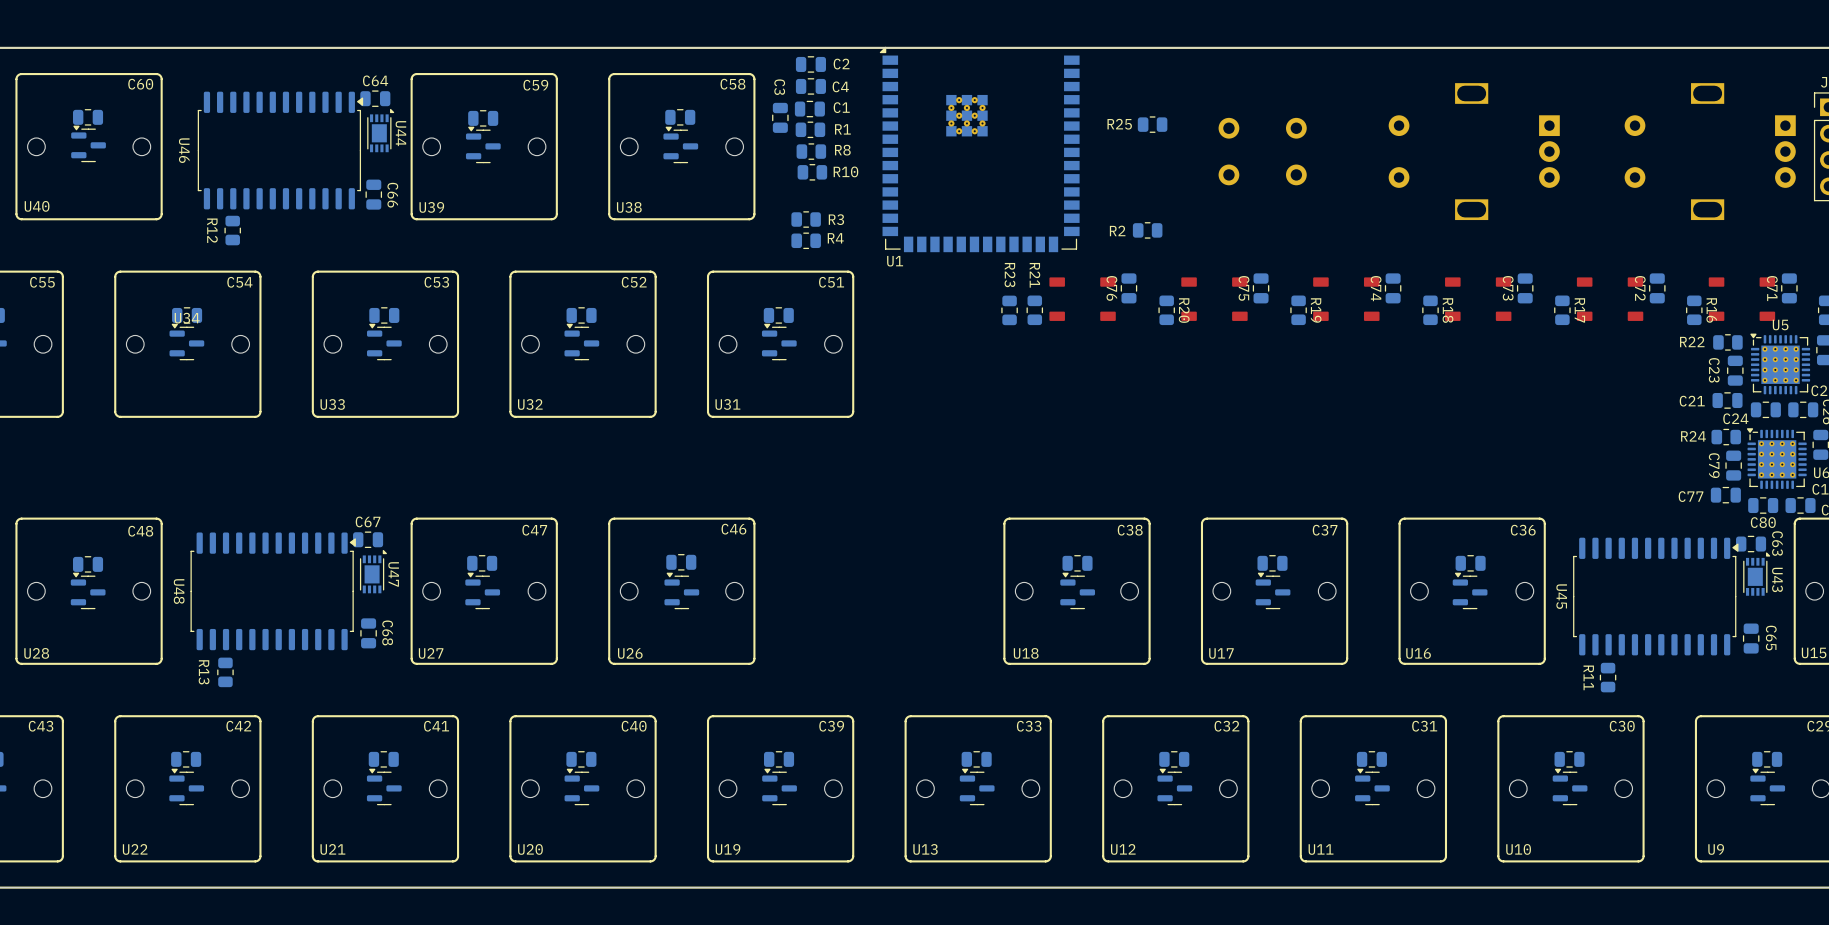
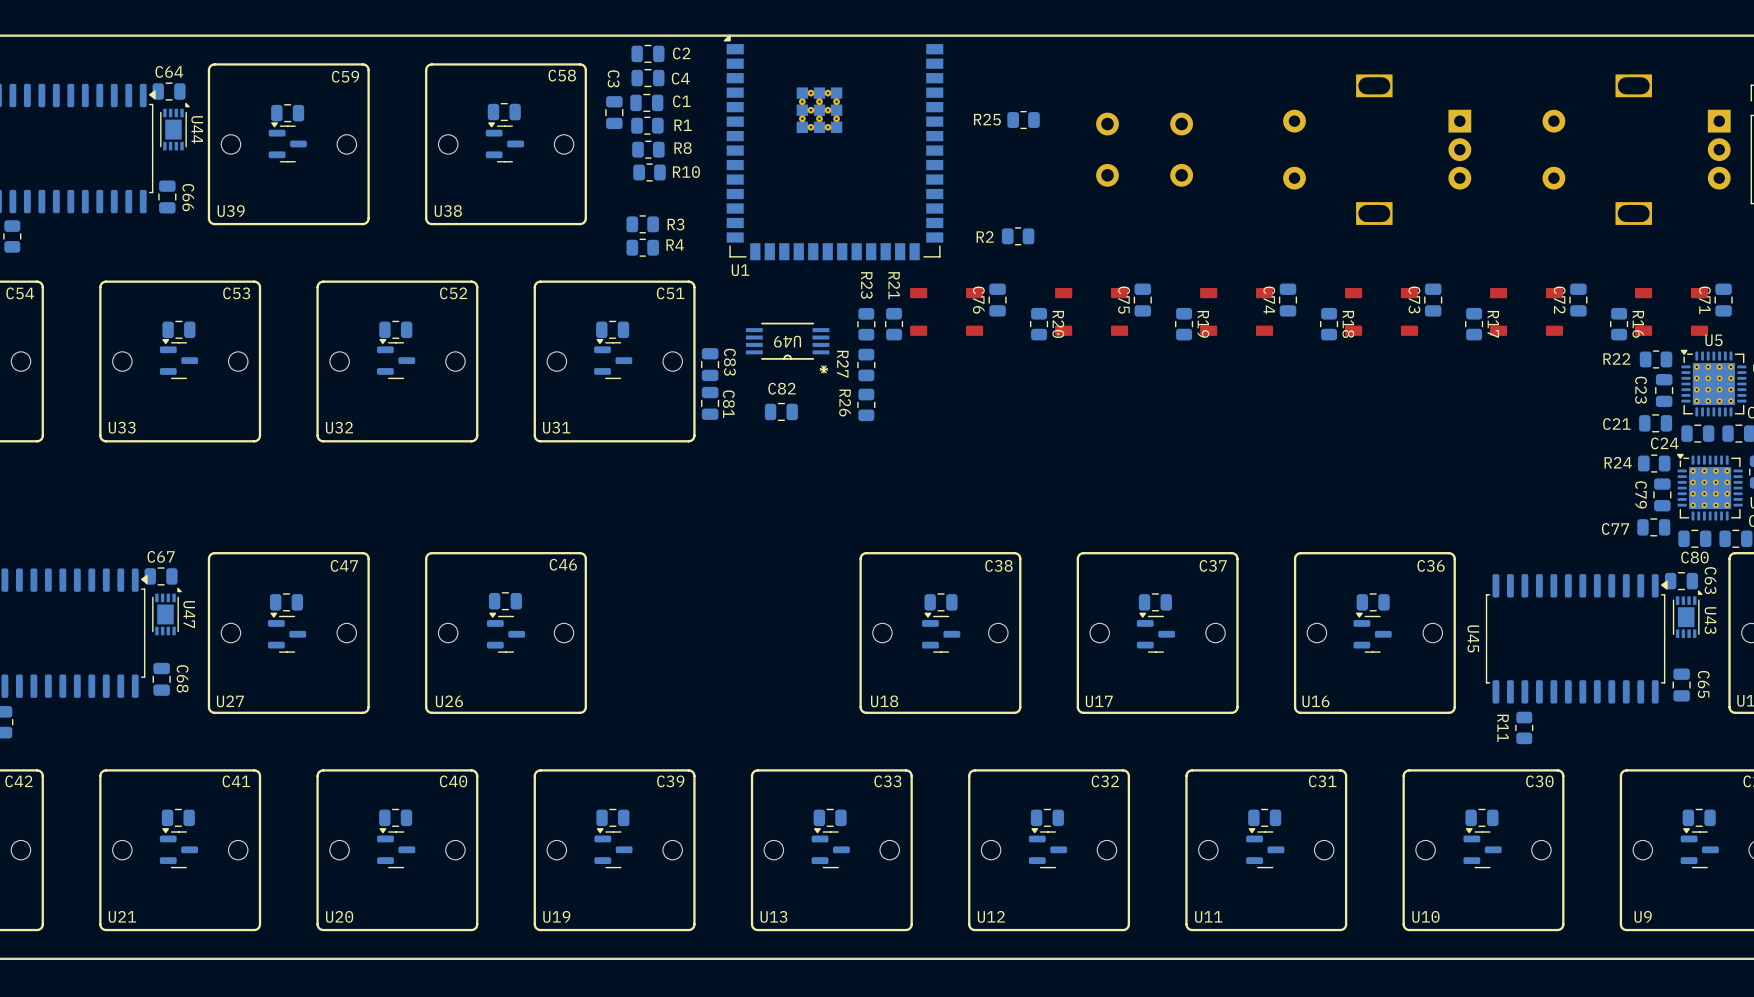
U49: none -> (787, 341)
C83: none -> (710, 364)
R27: none -> (866, 365)
C81: none -> (710, 403)
R26: none -> (866, 404)
C82: none -> (781, 411)

